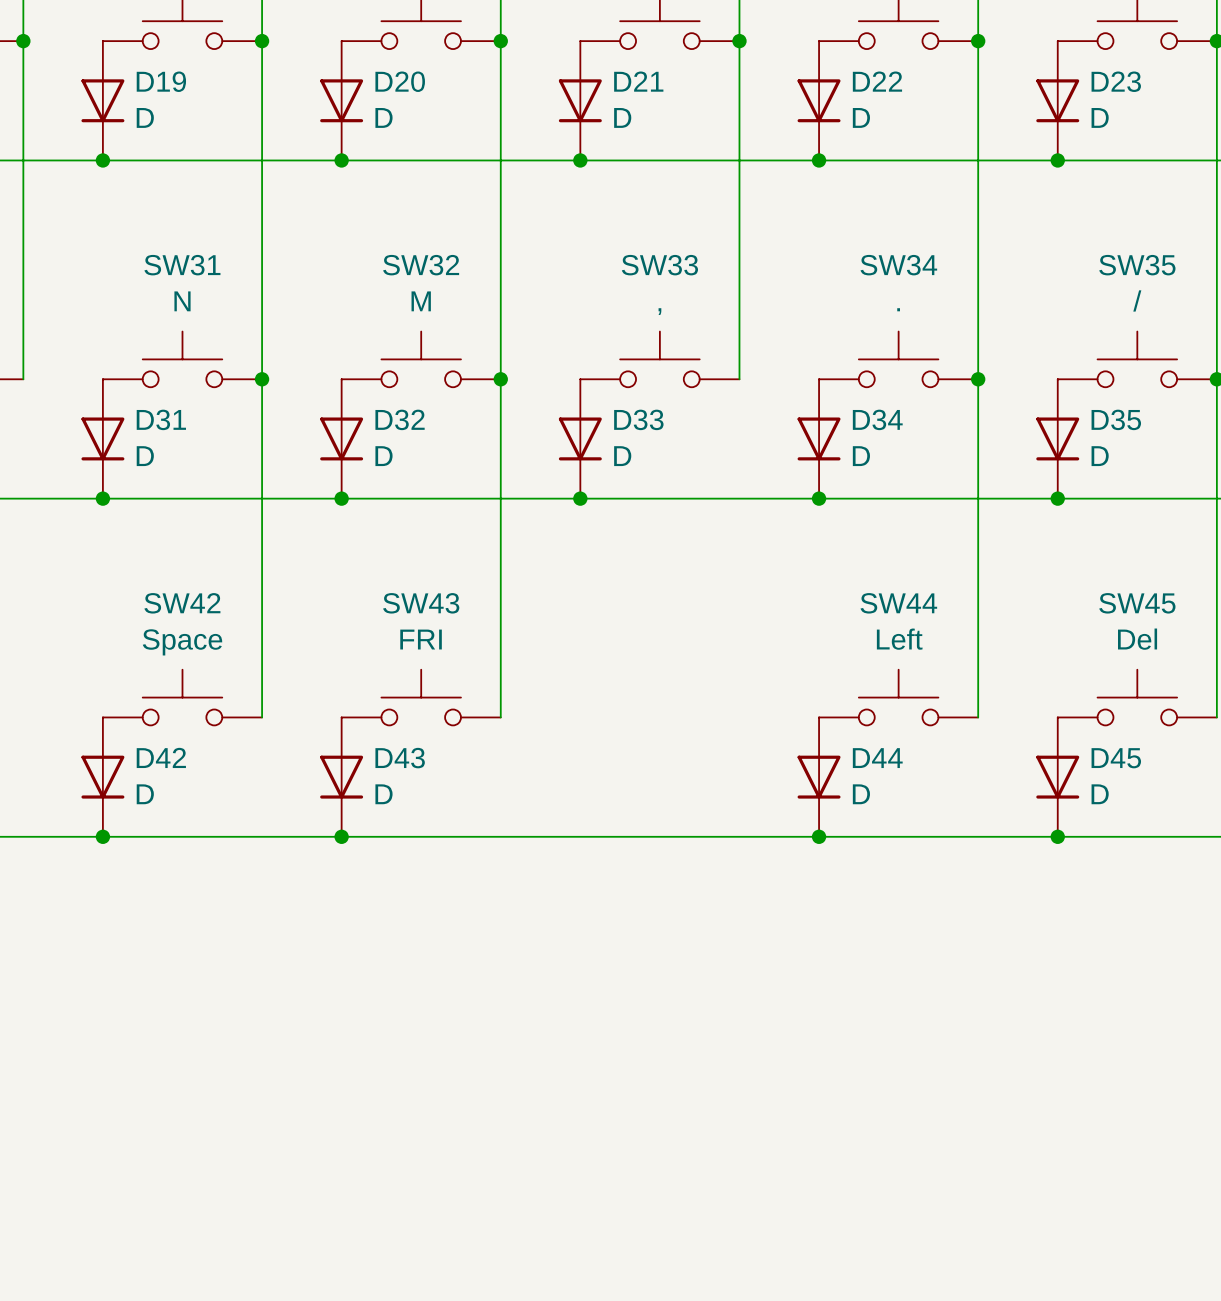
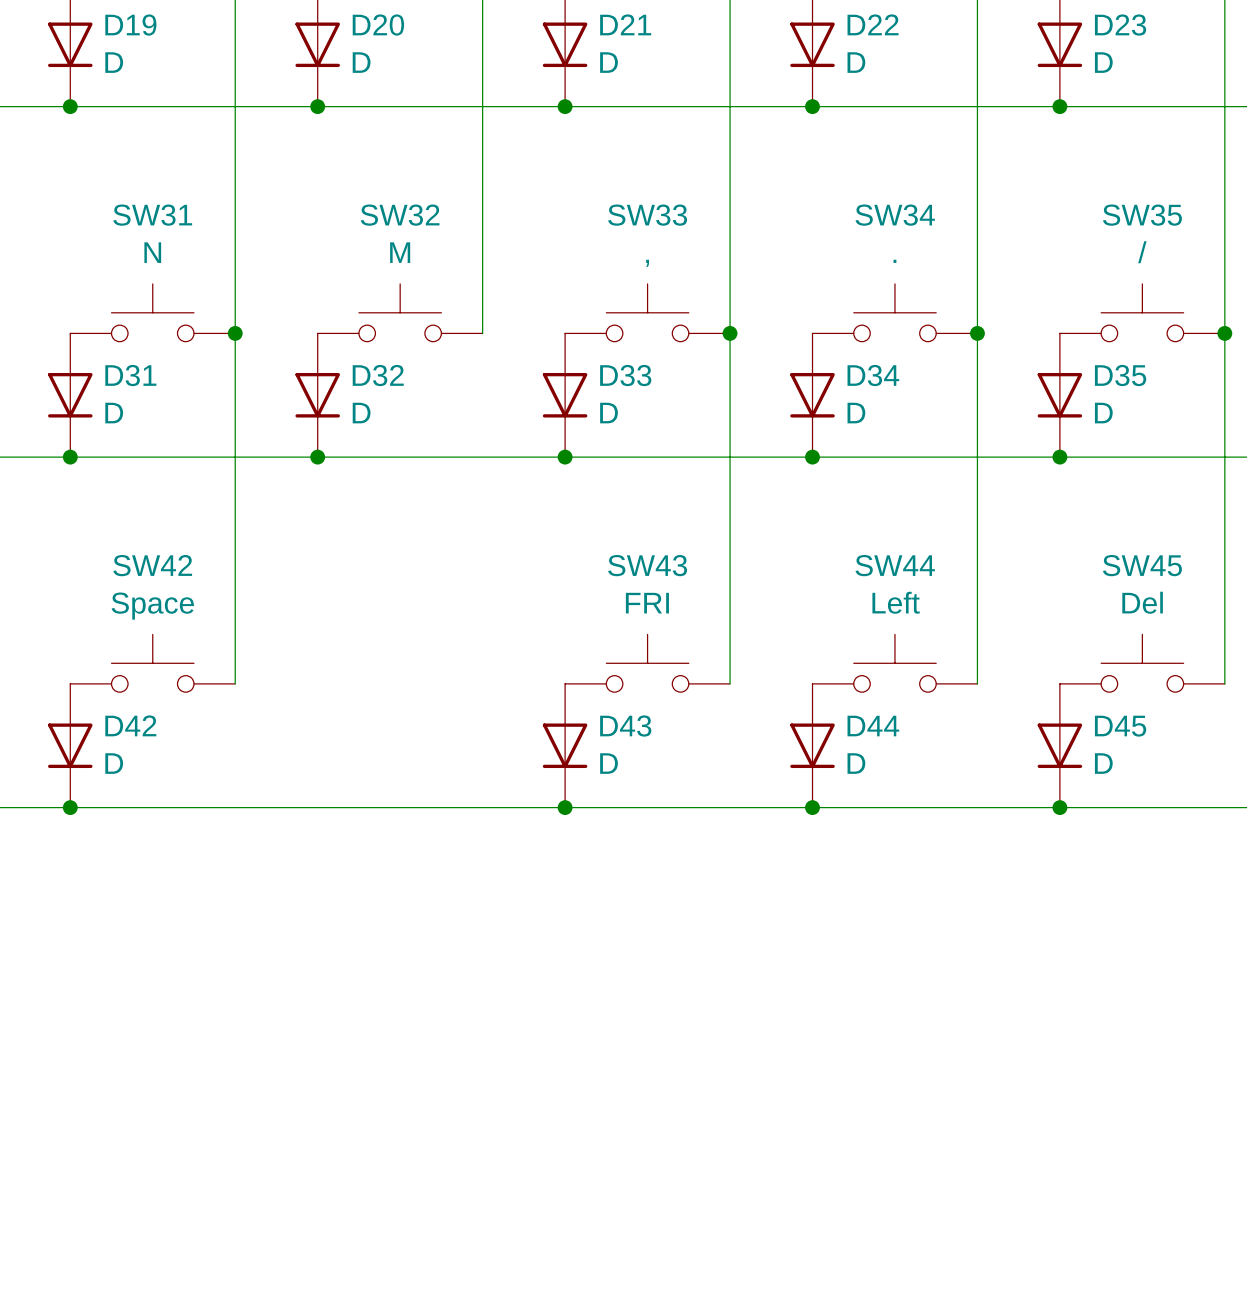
wire: (500, 379) (500, 717) -> (730, 333) (730, 683)
junction: (500, 379) -> none
junction: none -> (730, 333)
SW43 position: (421, 697) -> (647, 663)
D43 position: (341, 777) -> (565, 745)
junction: (341, 836) -> none
junction: none -> (565, 807)

